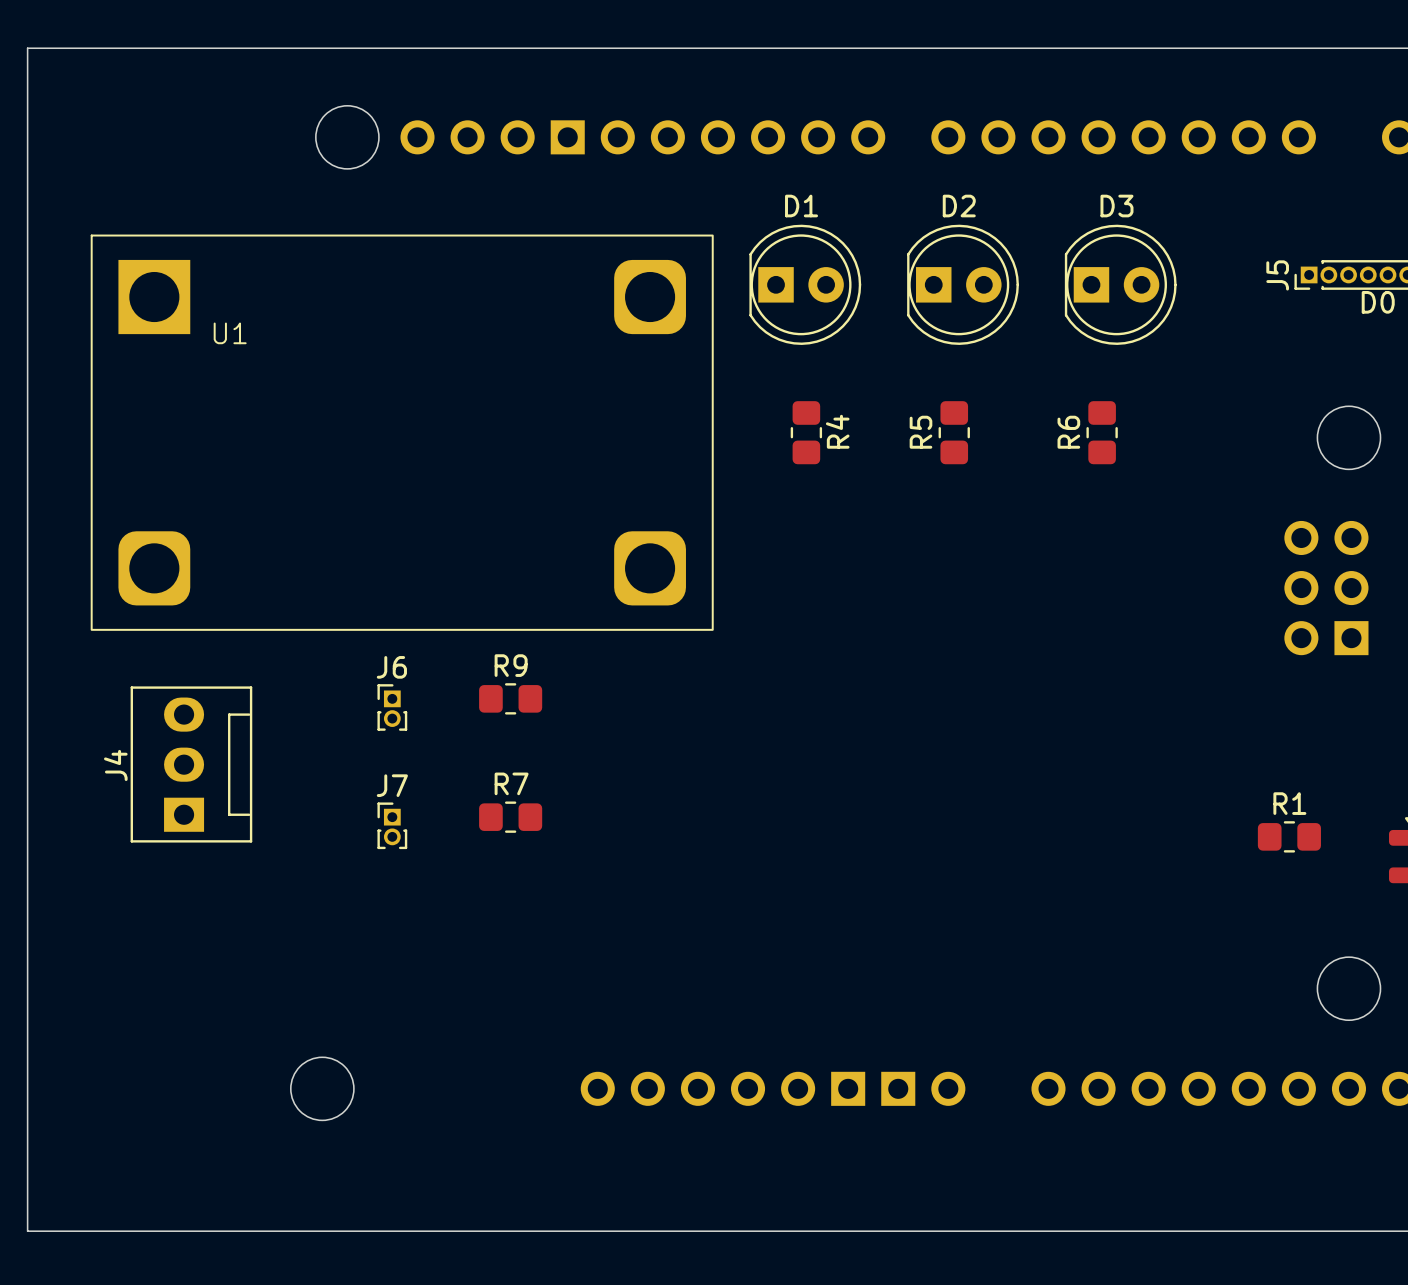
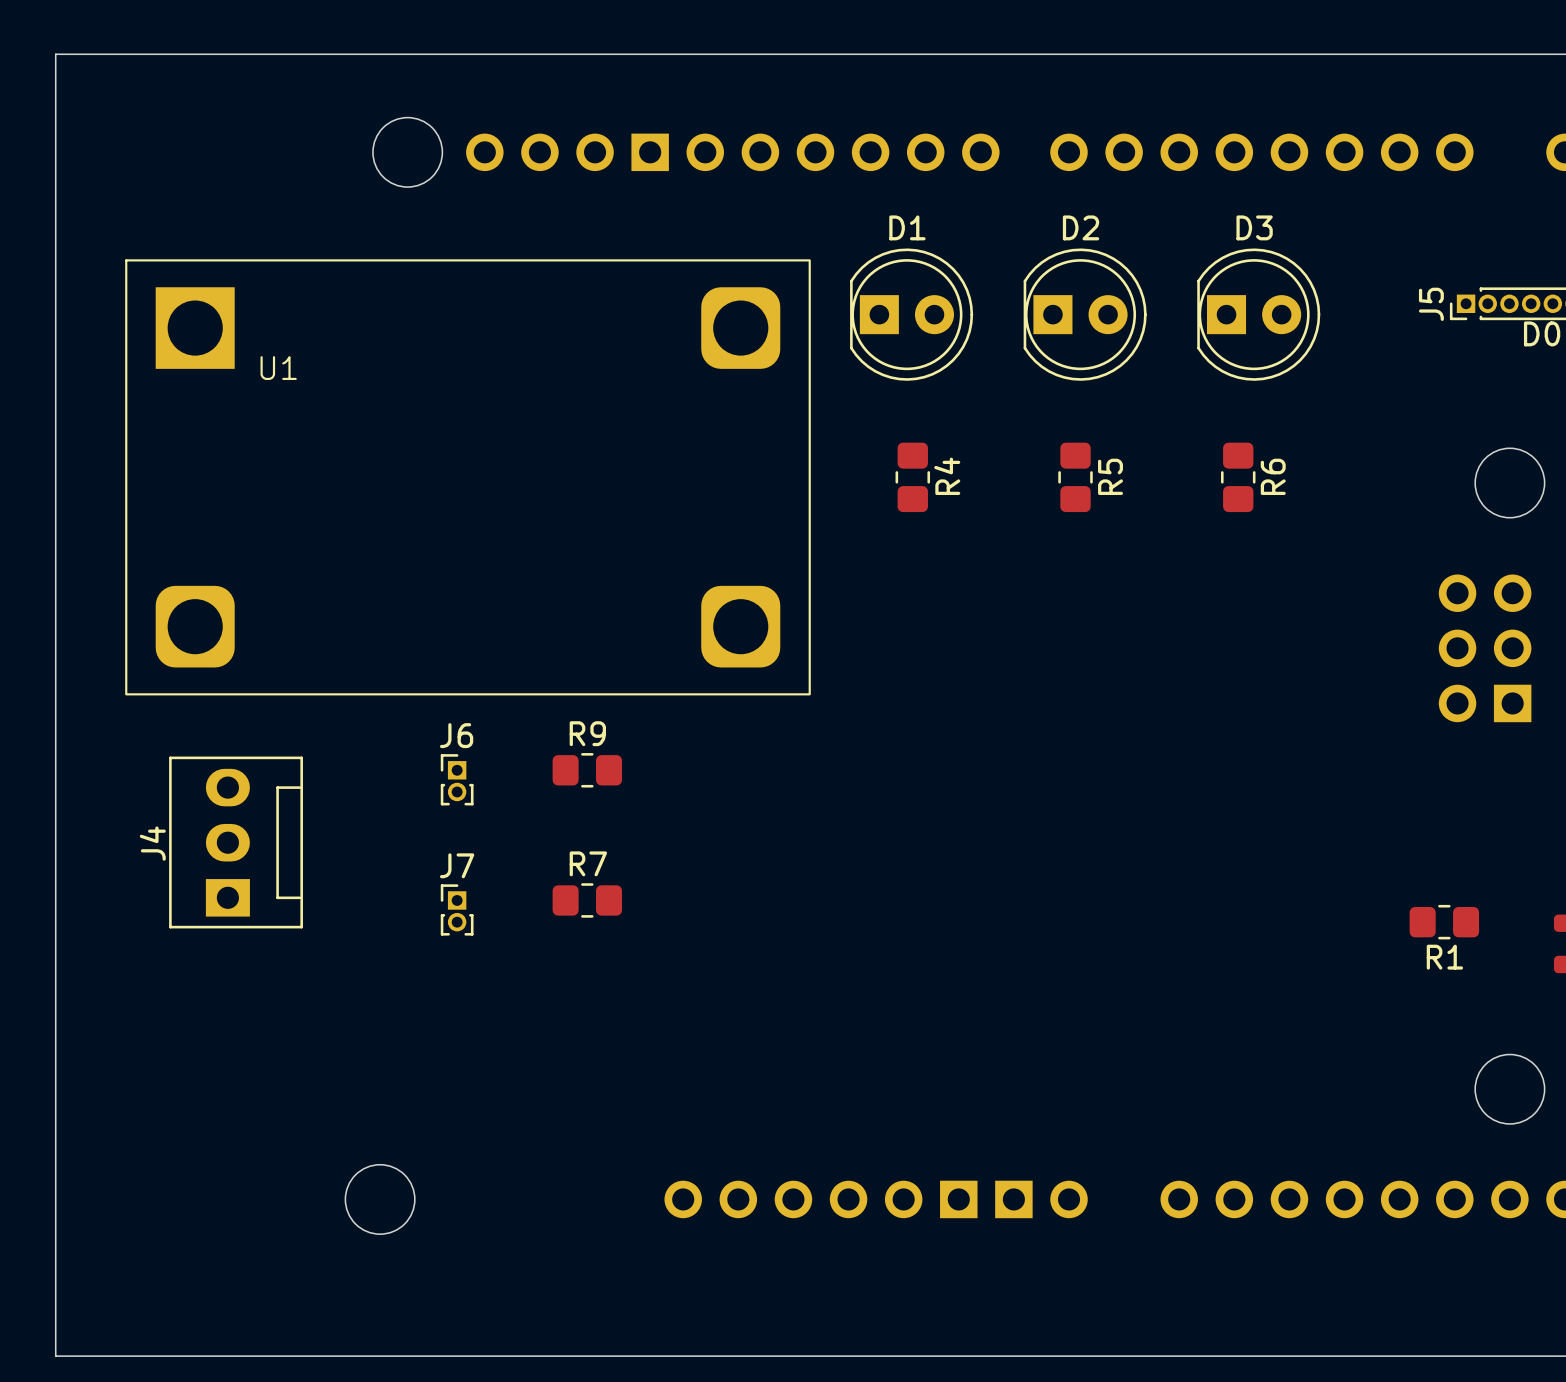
R5 name position: R5 (920, 432) -> R5 (1110, 476)
R6 name position: R6 (1068, 432) -> R6 (1273, 476)
R1 name position: R1 (1289, 803) -> R1 (1444, 957)

